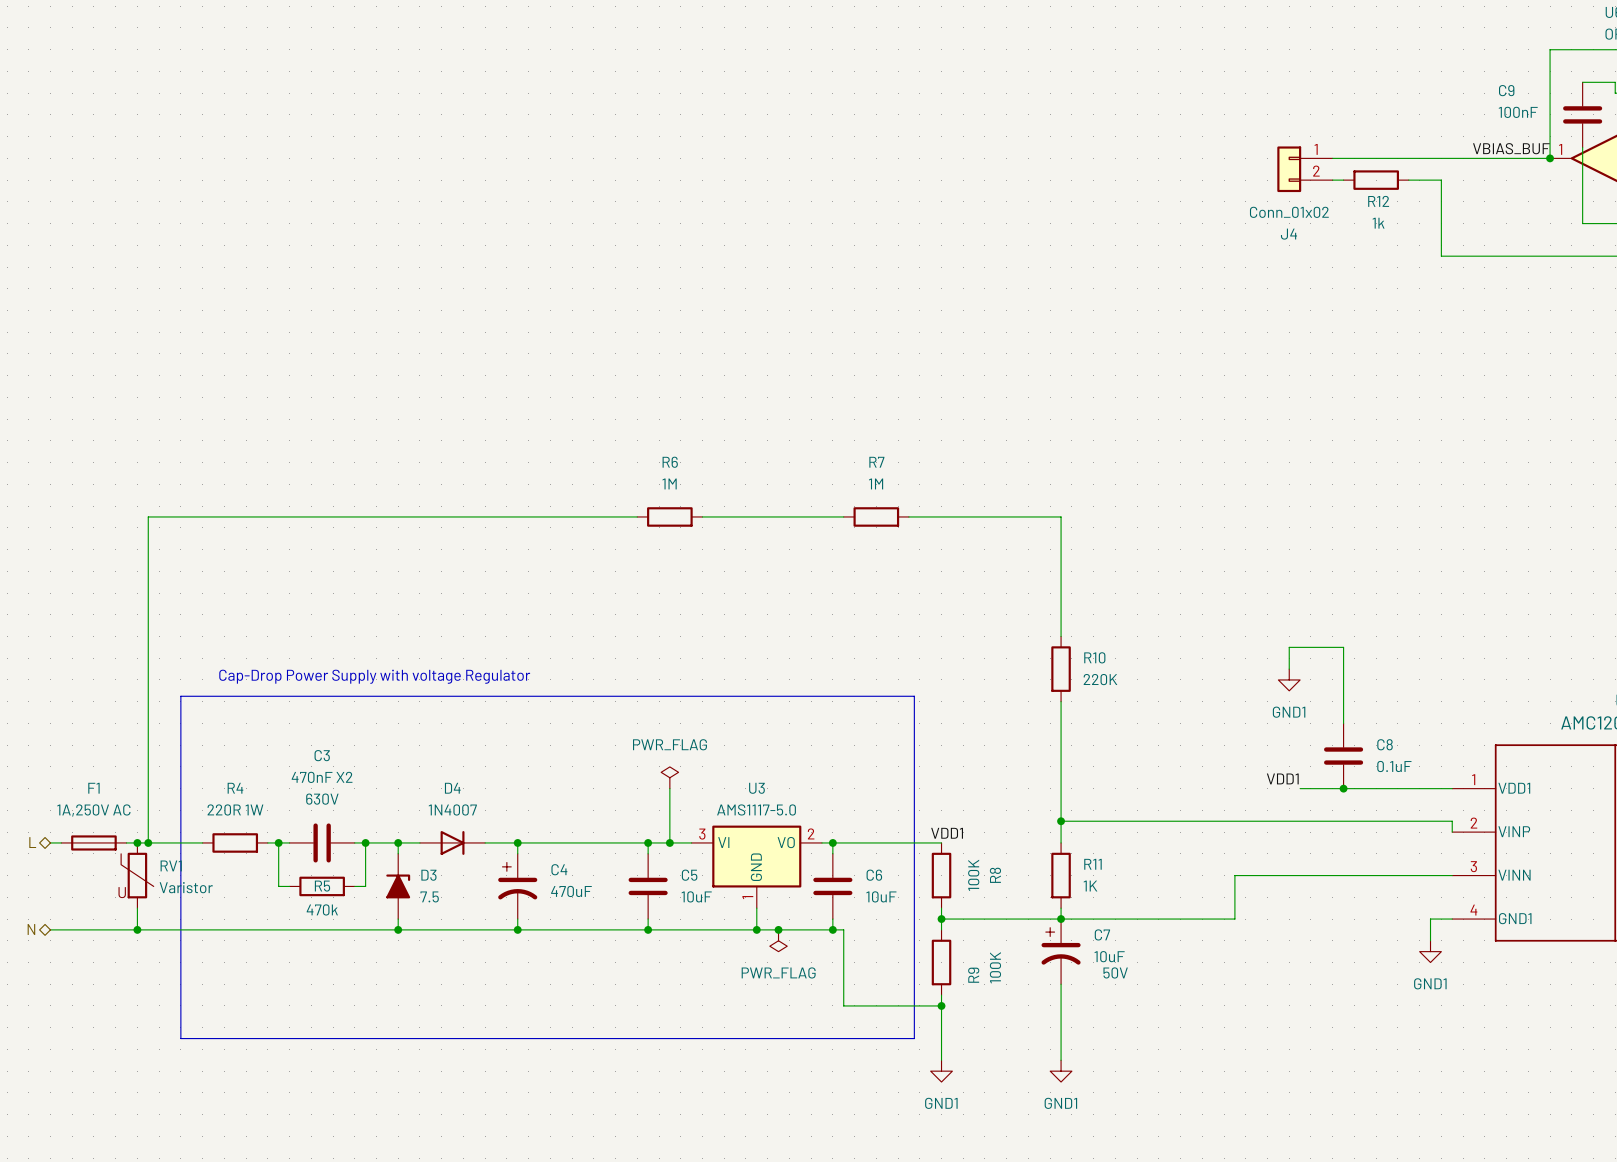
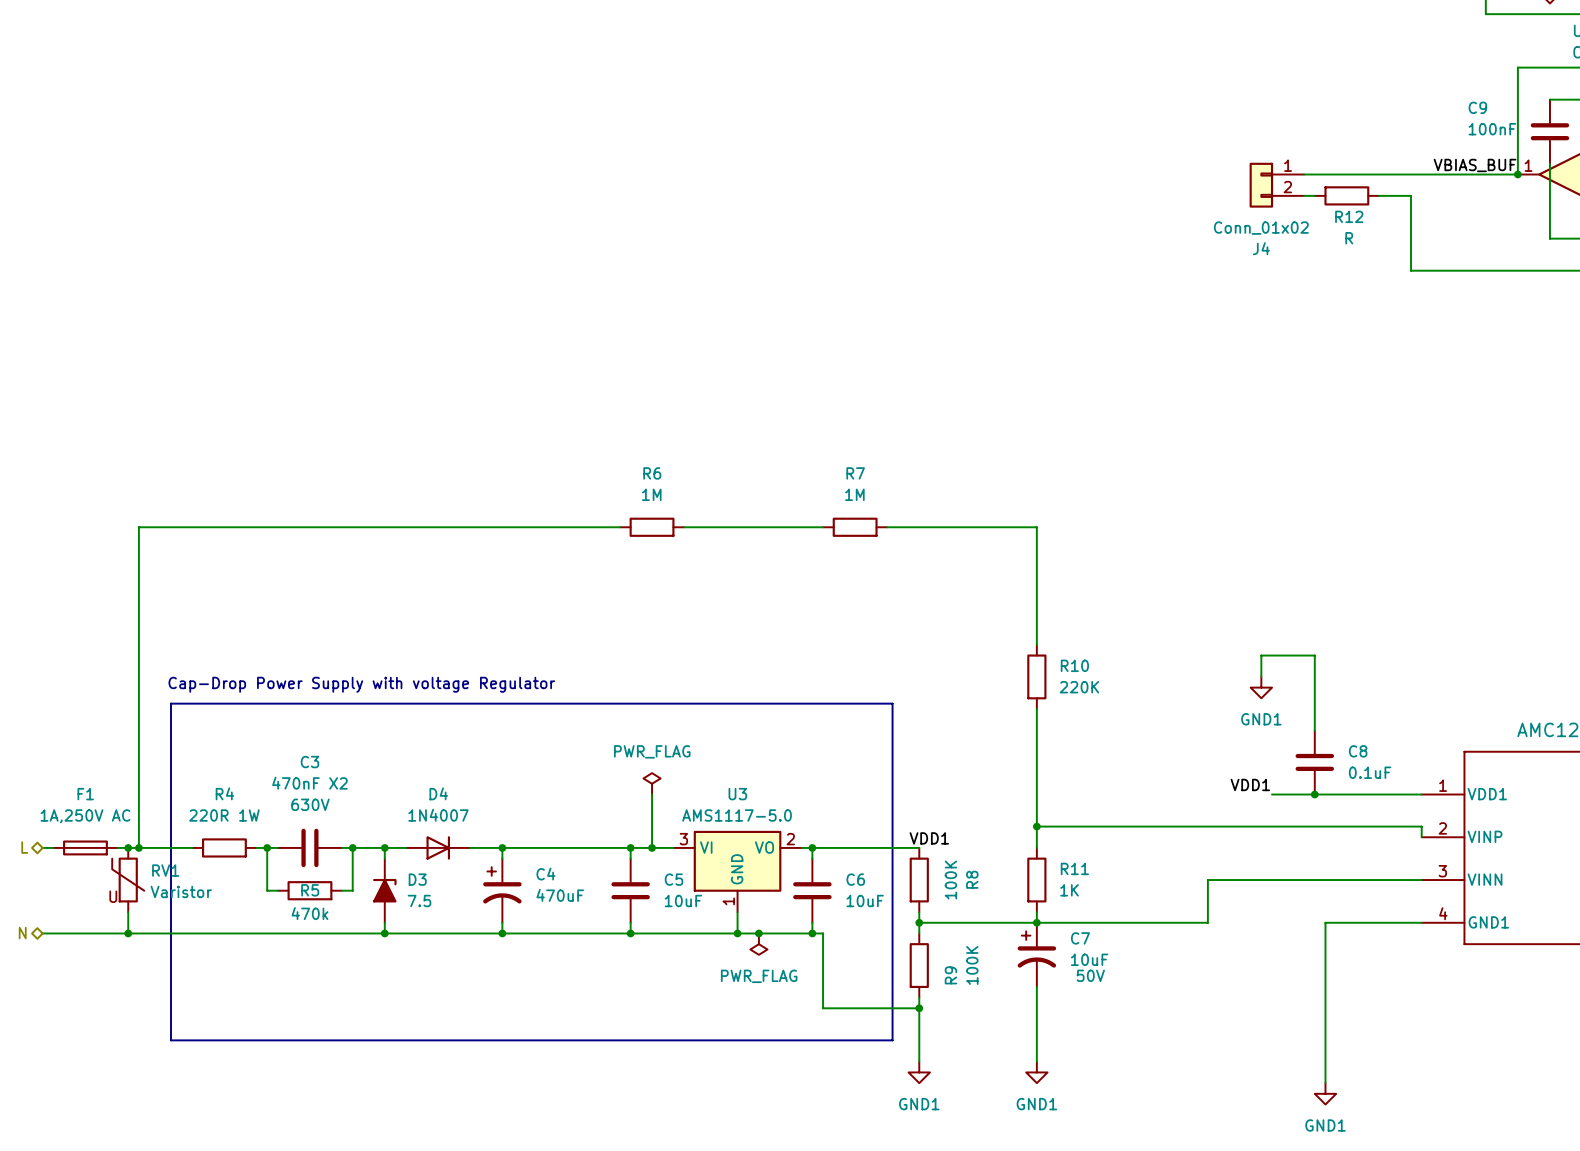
R12 value: 1k (1378, 223) -> R (1349, 238)
wire: (1430, 919) (1430, 940) -> (1400, 922) (1325, 922) (1325, 1083)
power symbol position: GND1 (1430, 951) -> GND1 (1325, 1093)

